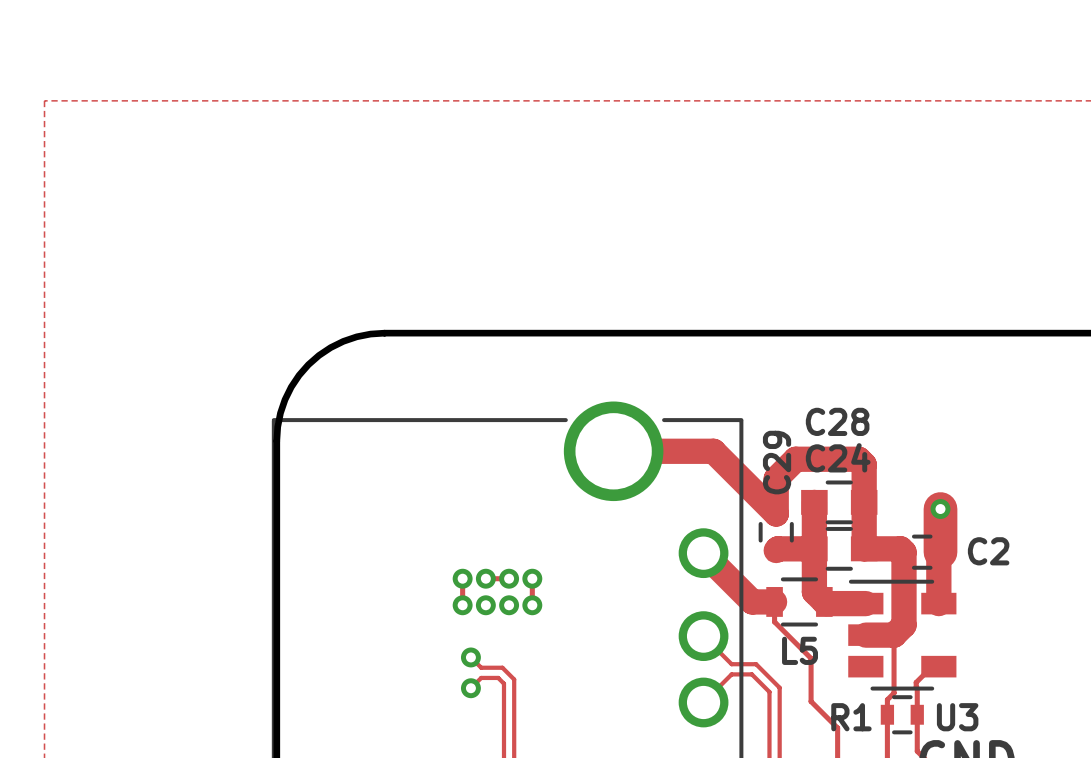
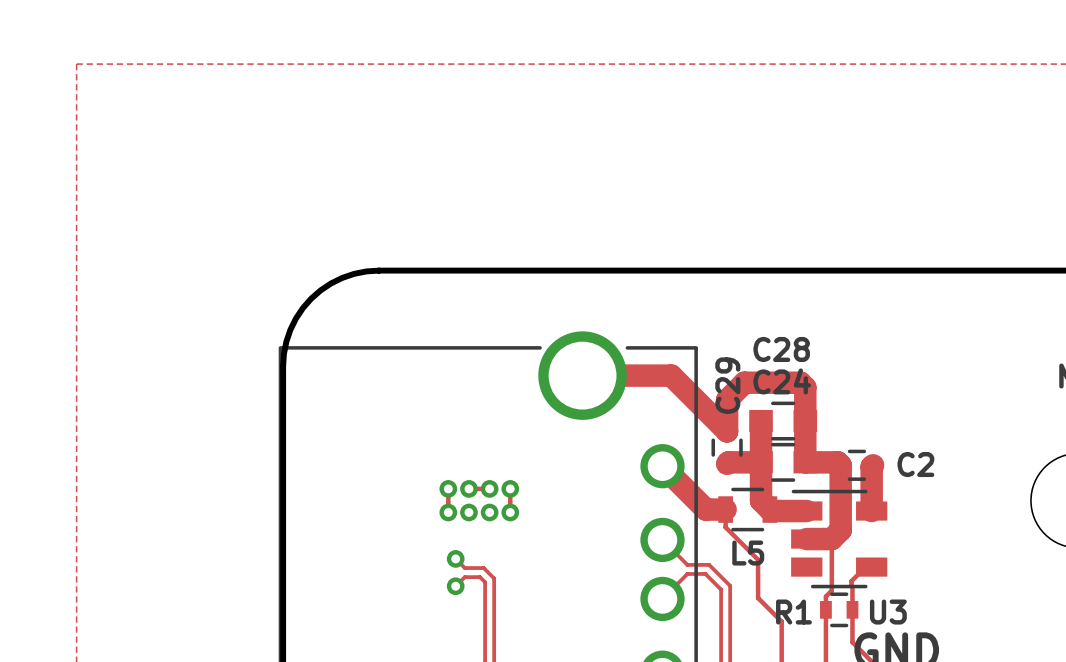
track: (940, 509) (940, 552) -> none
via: (940, 509) -> none

